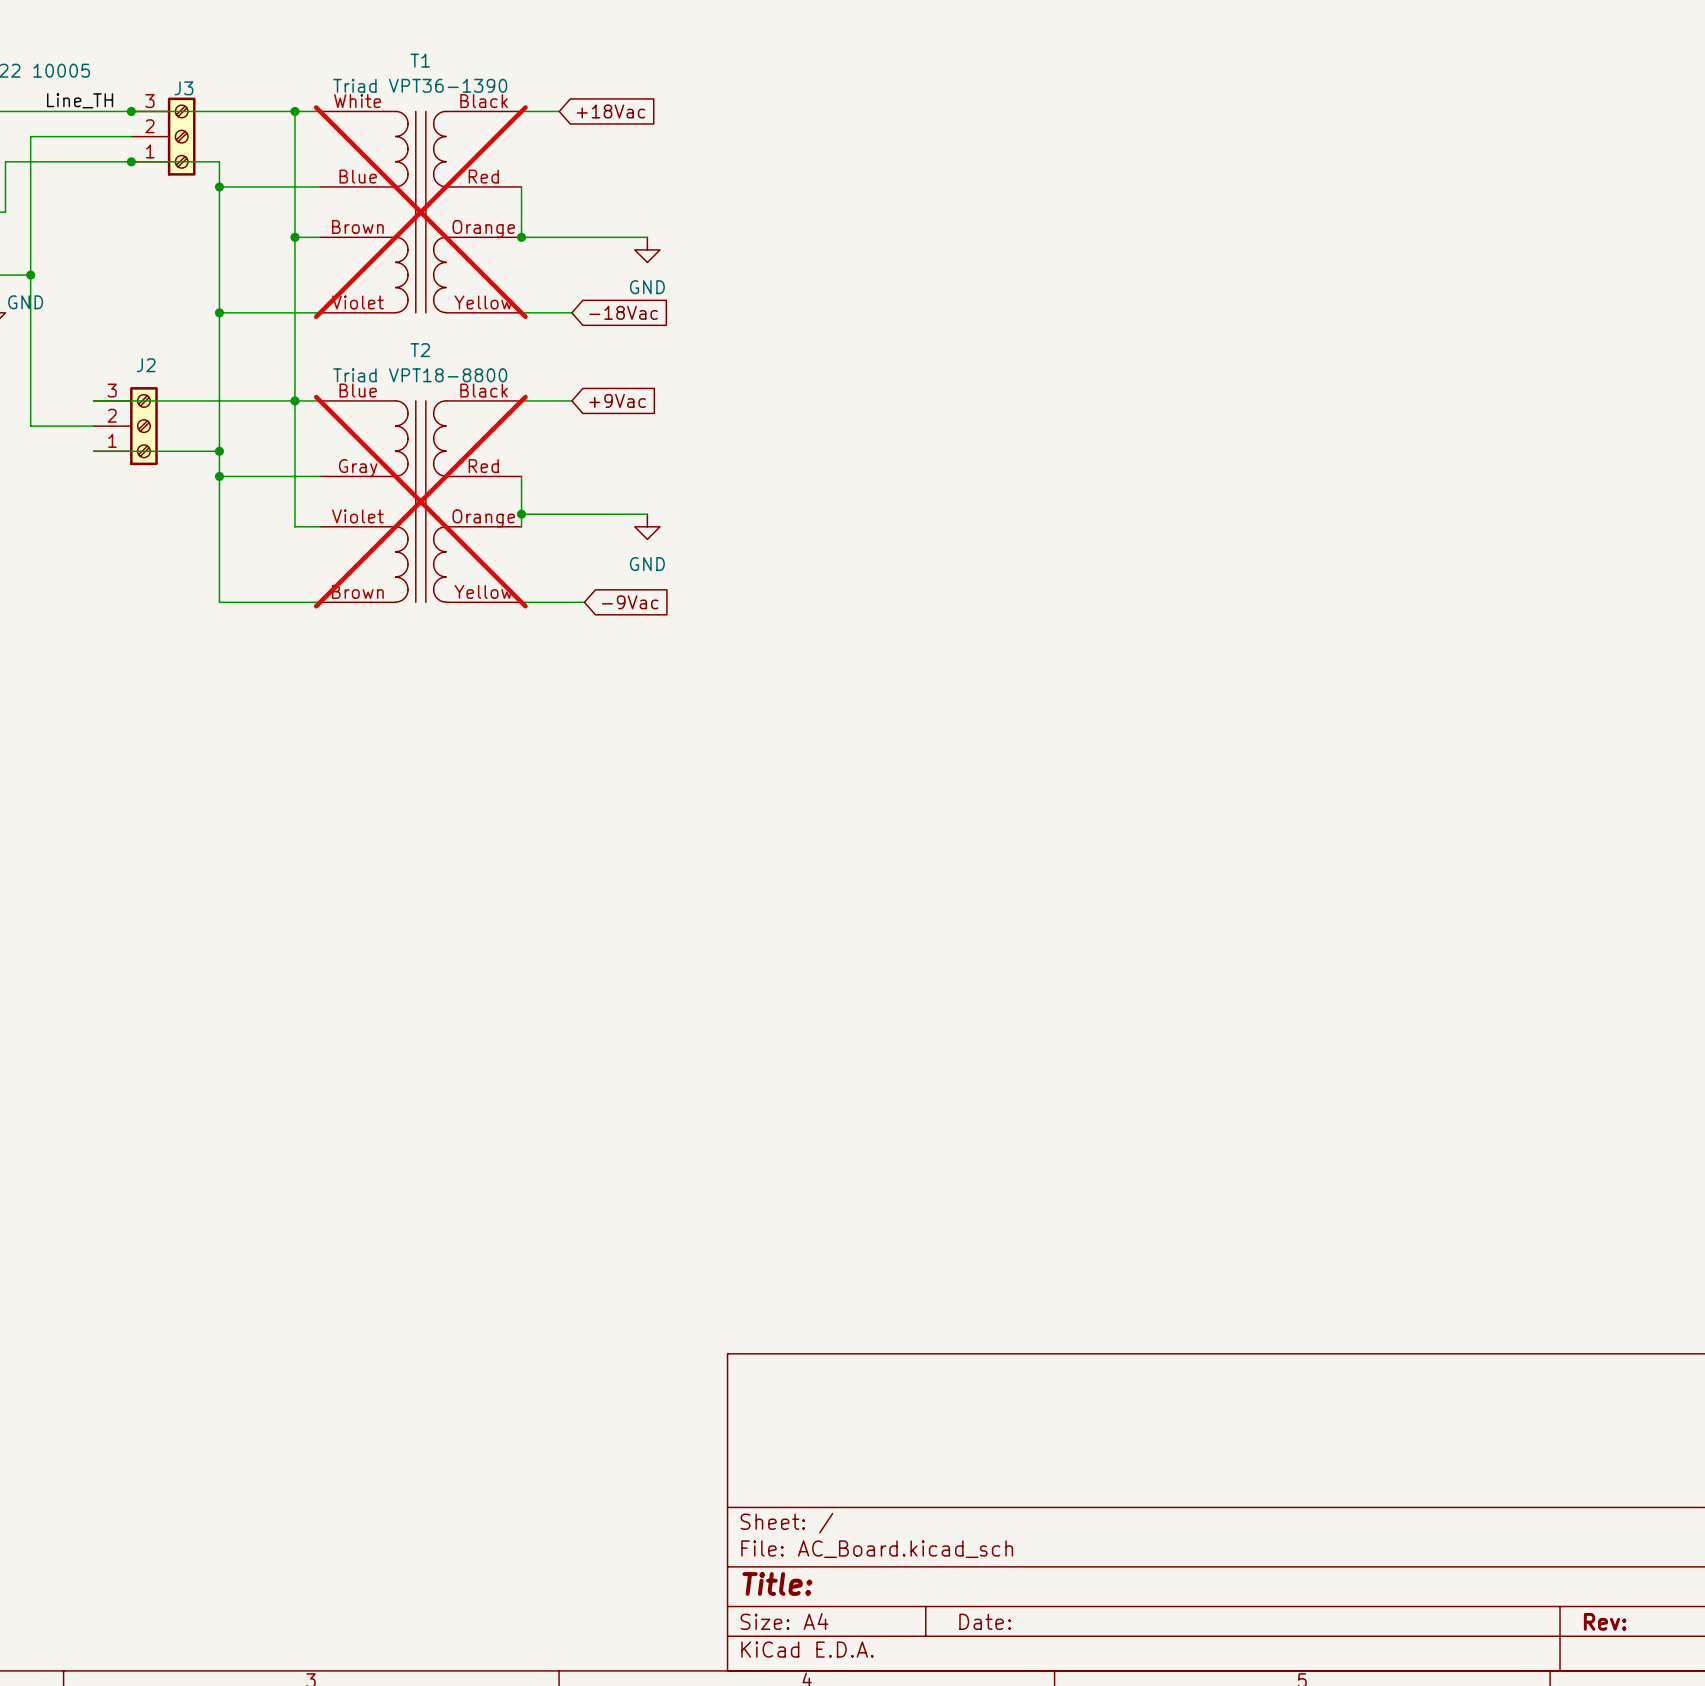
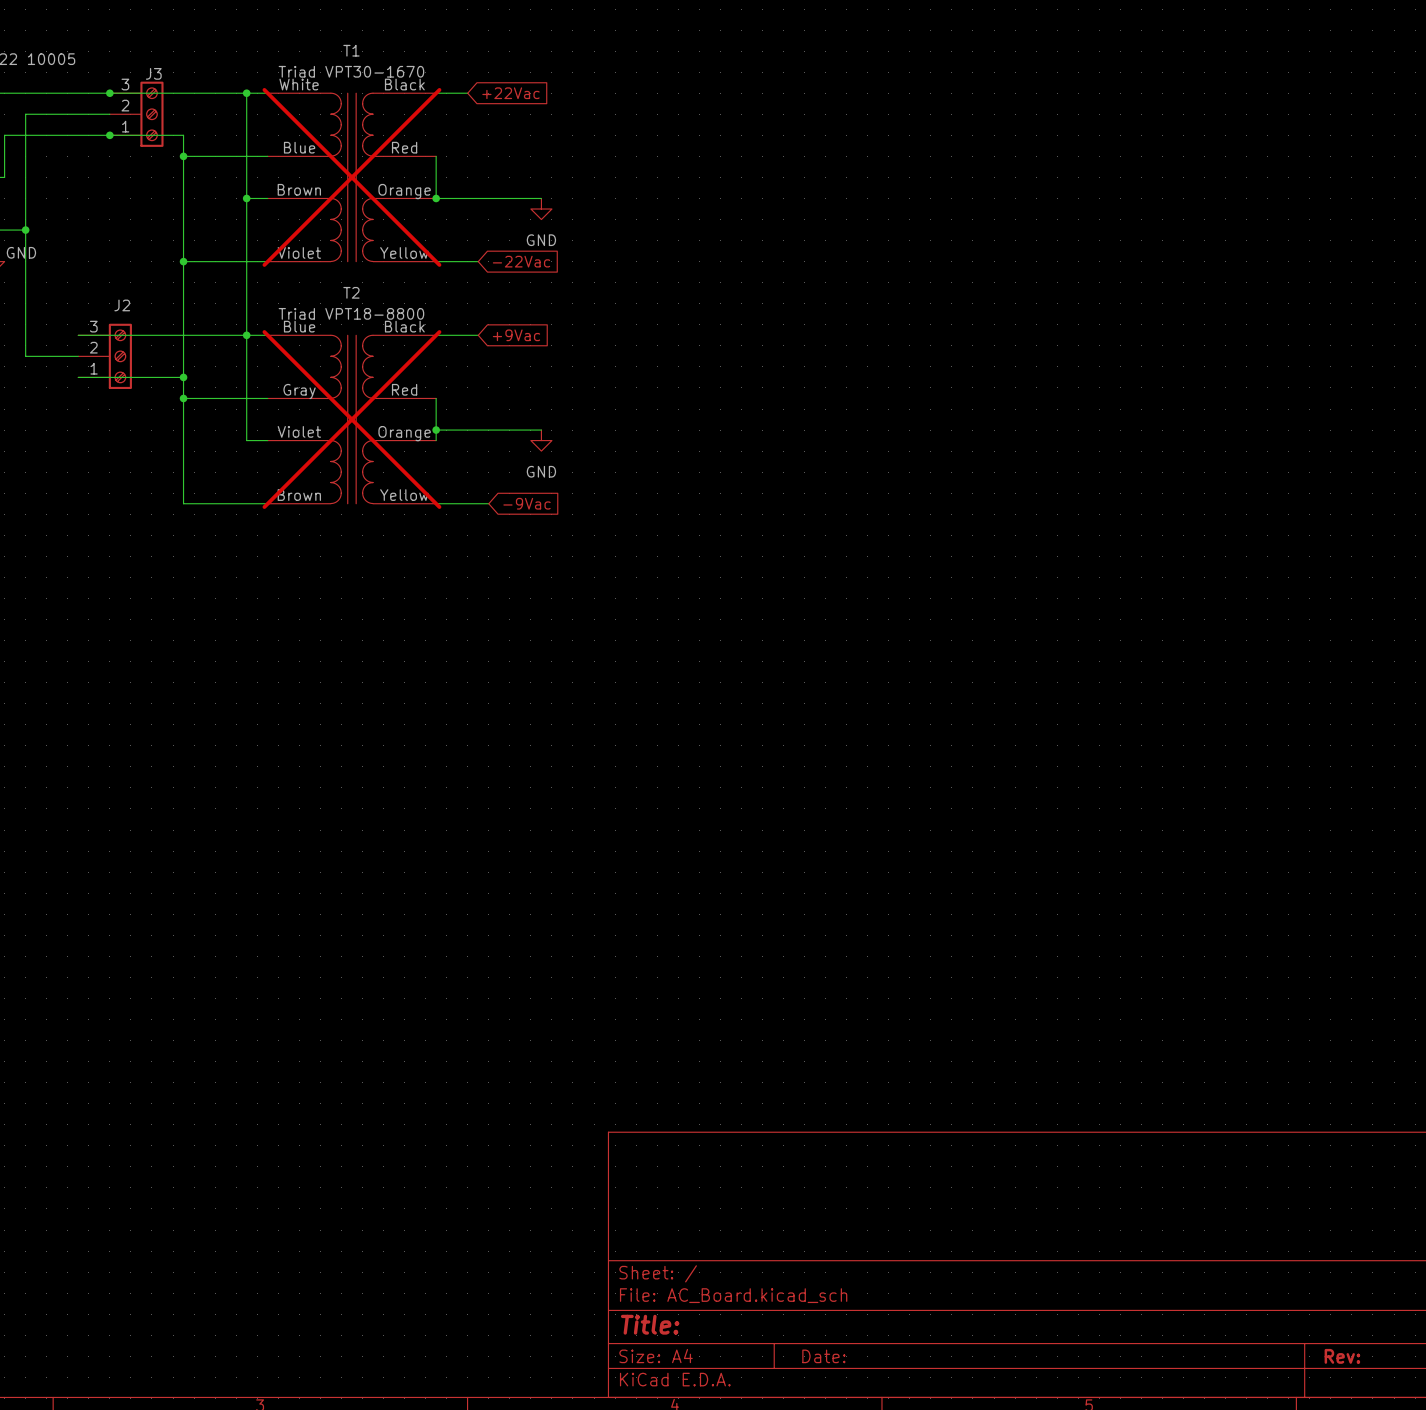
T1 value: Triad VPT36-1390 (420, 85) -> Triad VPT30-1670 (351, 71)
label: Line_TH (80, 100) -> none
global label: +18Vac (610, 111) -> +22Vac (510, 93)
global label: -18Vac (623, 312) -> -22Vac (521, 261)

